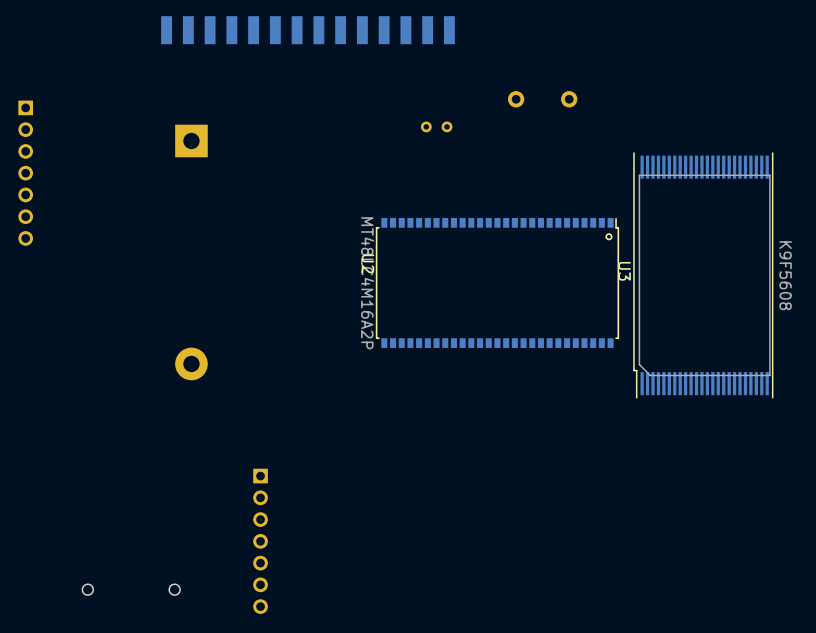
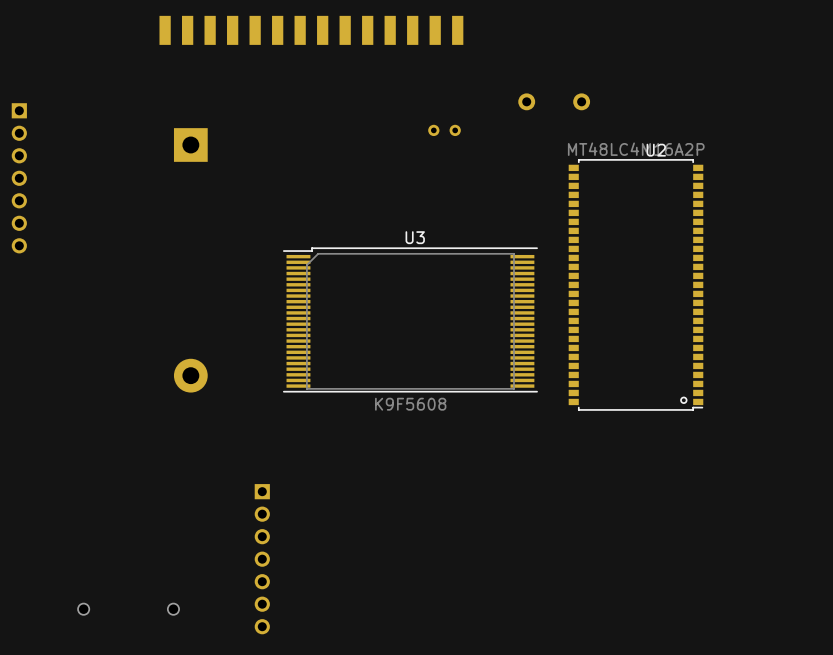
U3 rotation: 0° (703, 275) -> 90° clockwise (410, 319)
U3 position: (703, 275) -> (410, 319)
U2 rotation: 0° (497, 282) -> 90° clockwise (635, 284)

